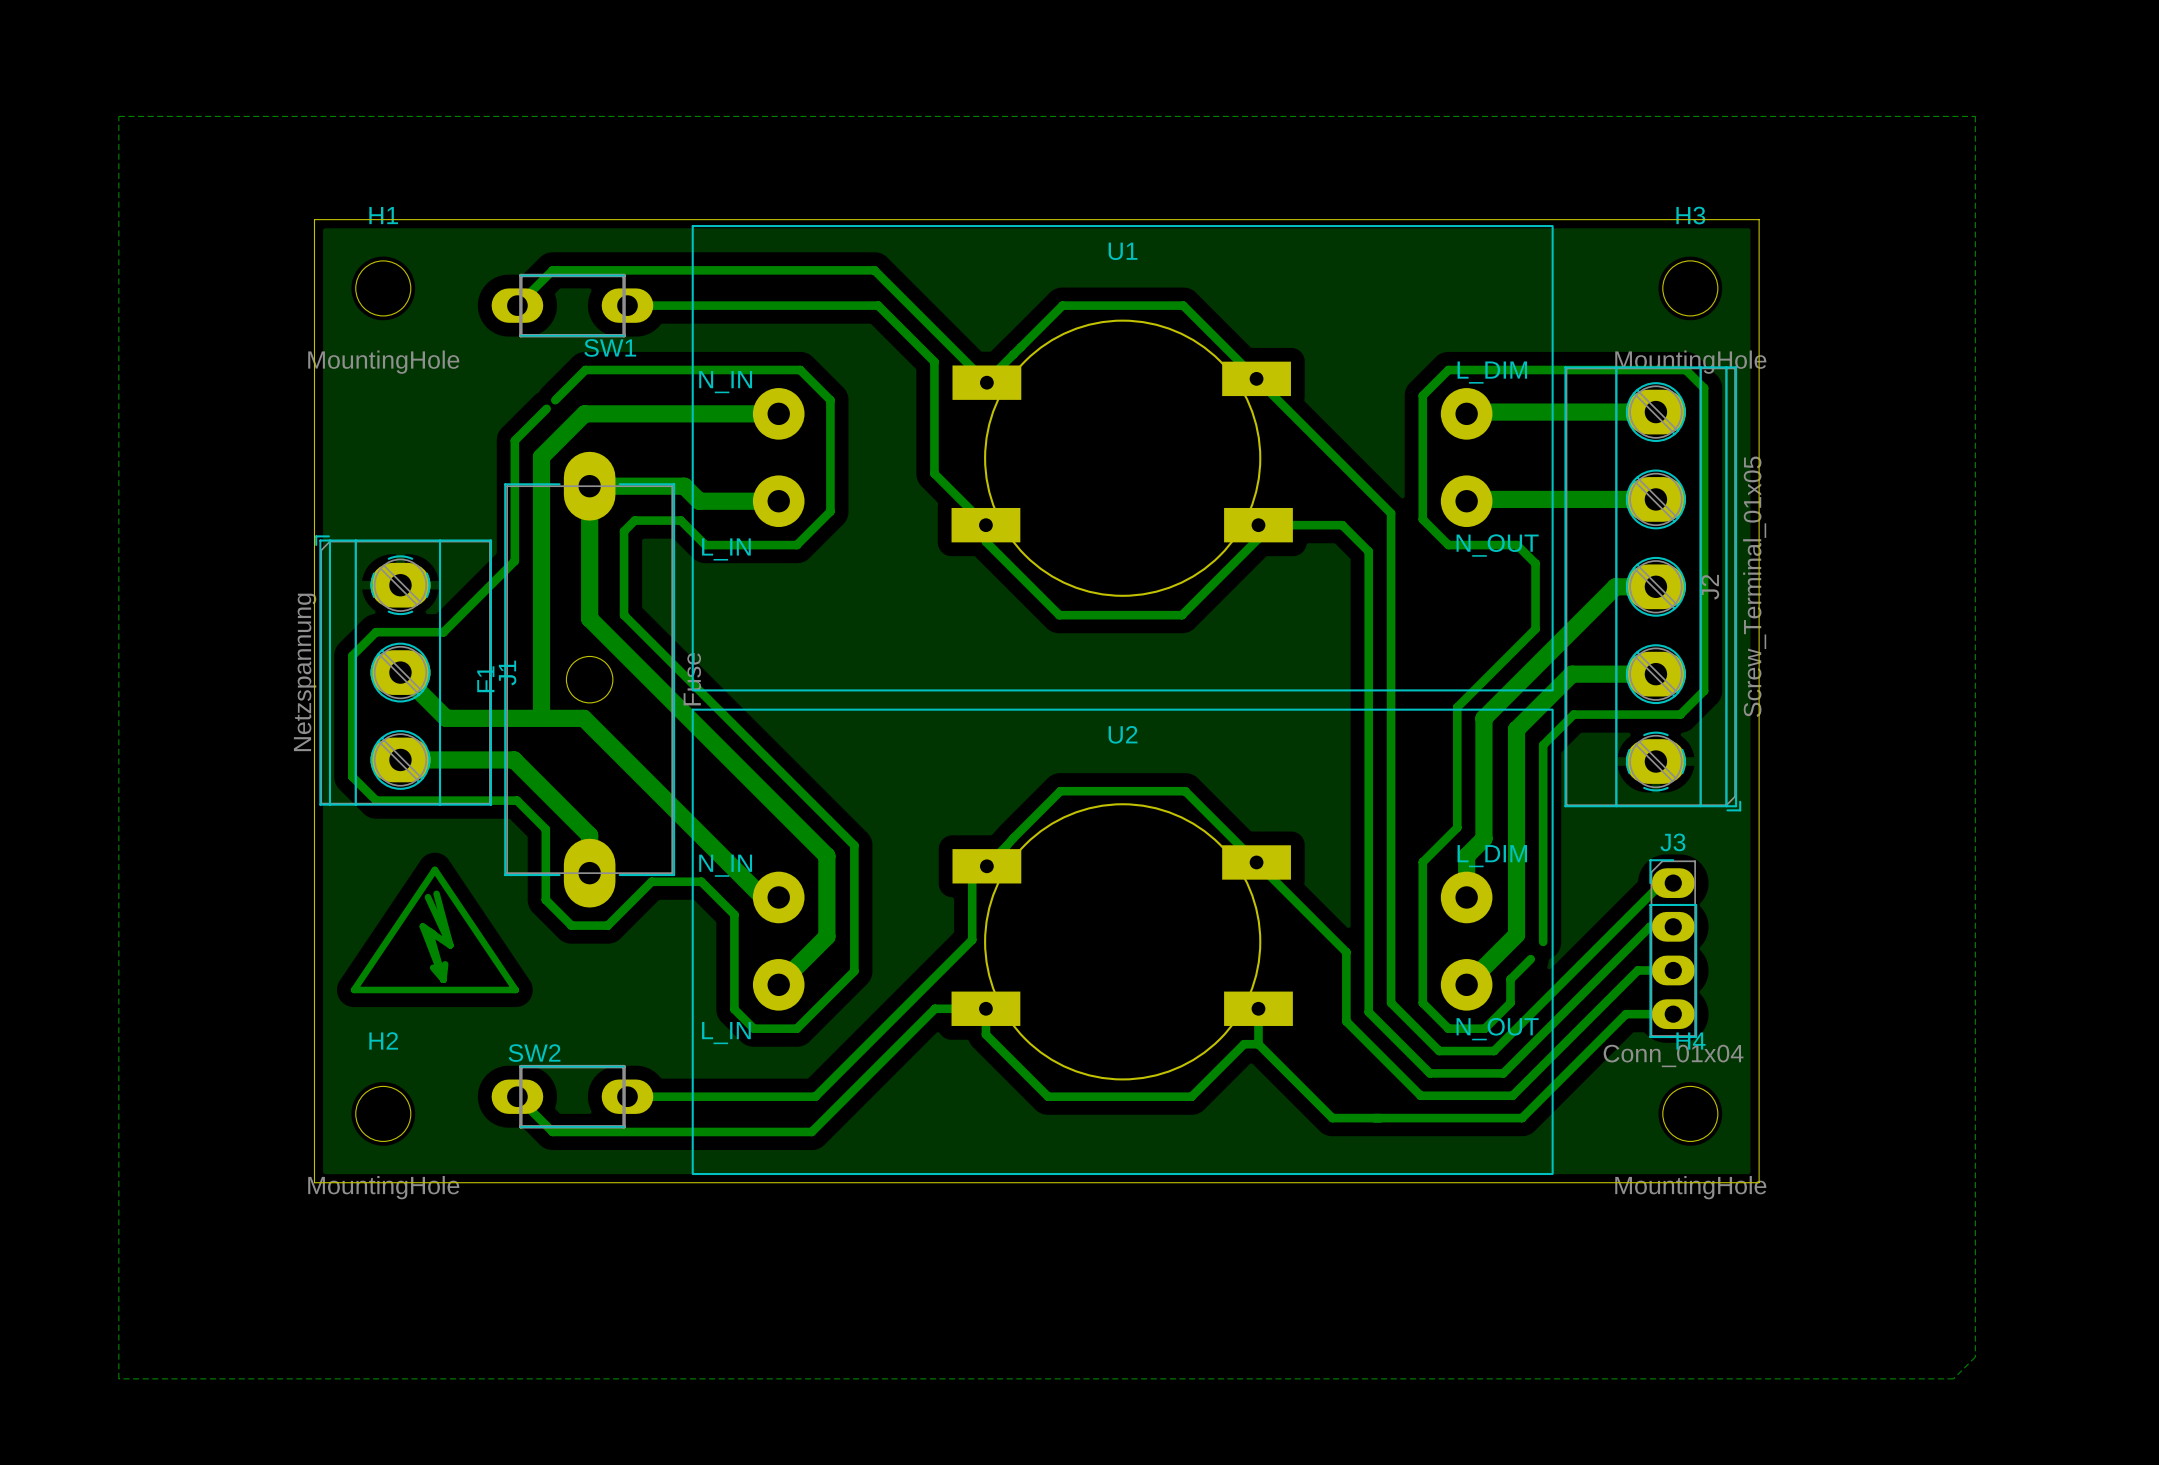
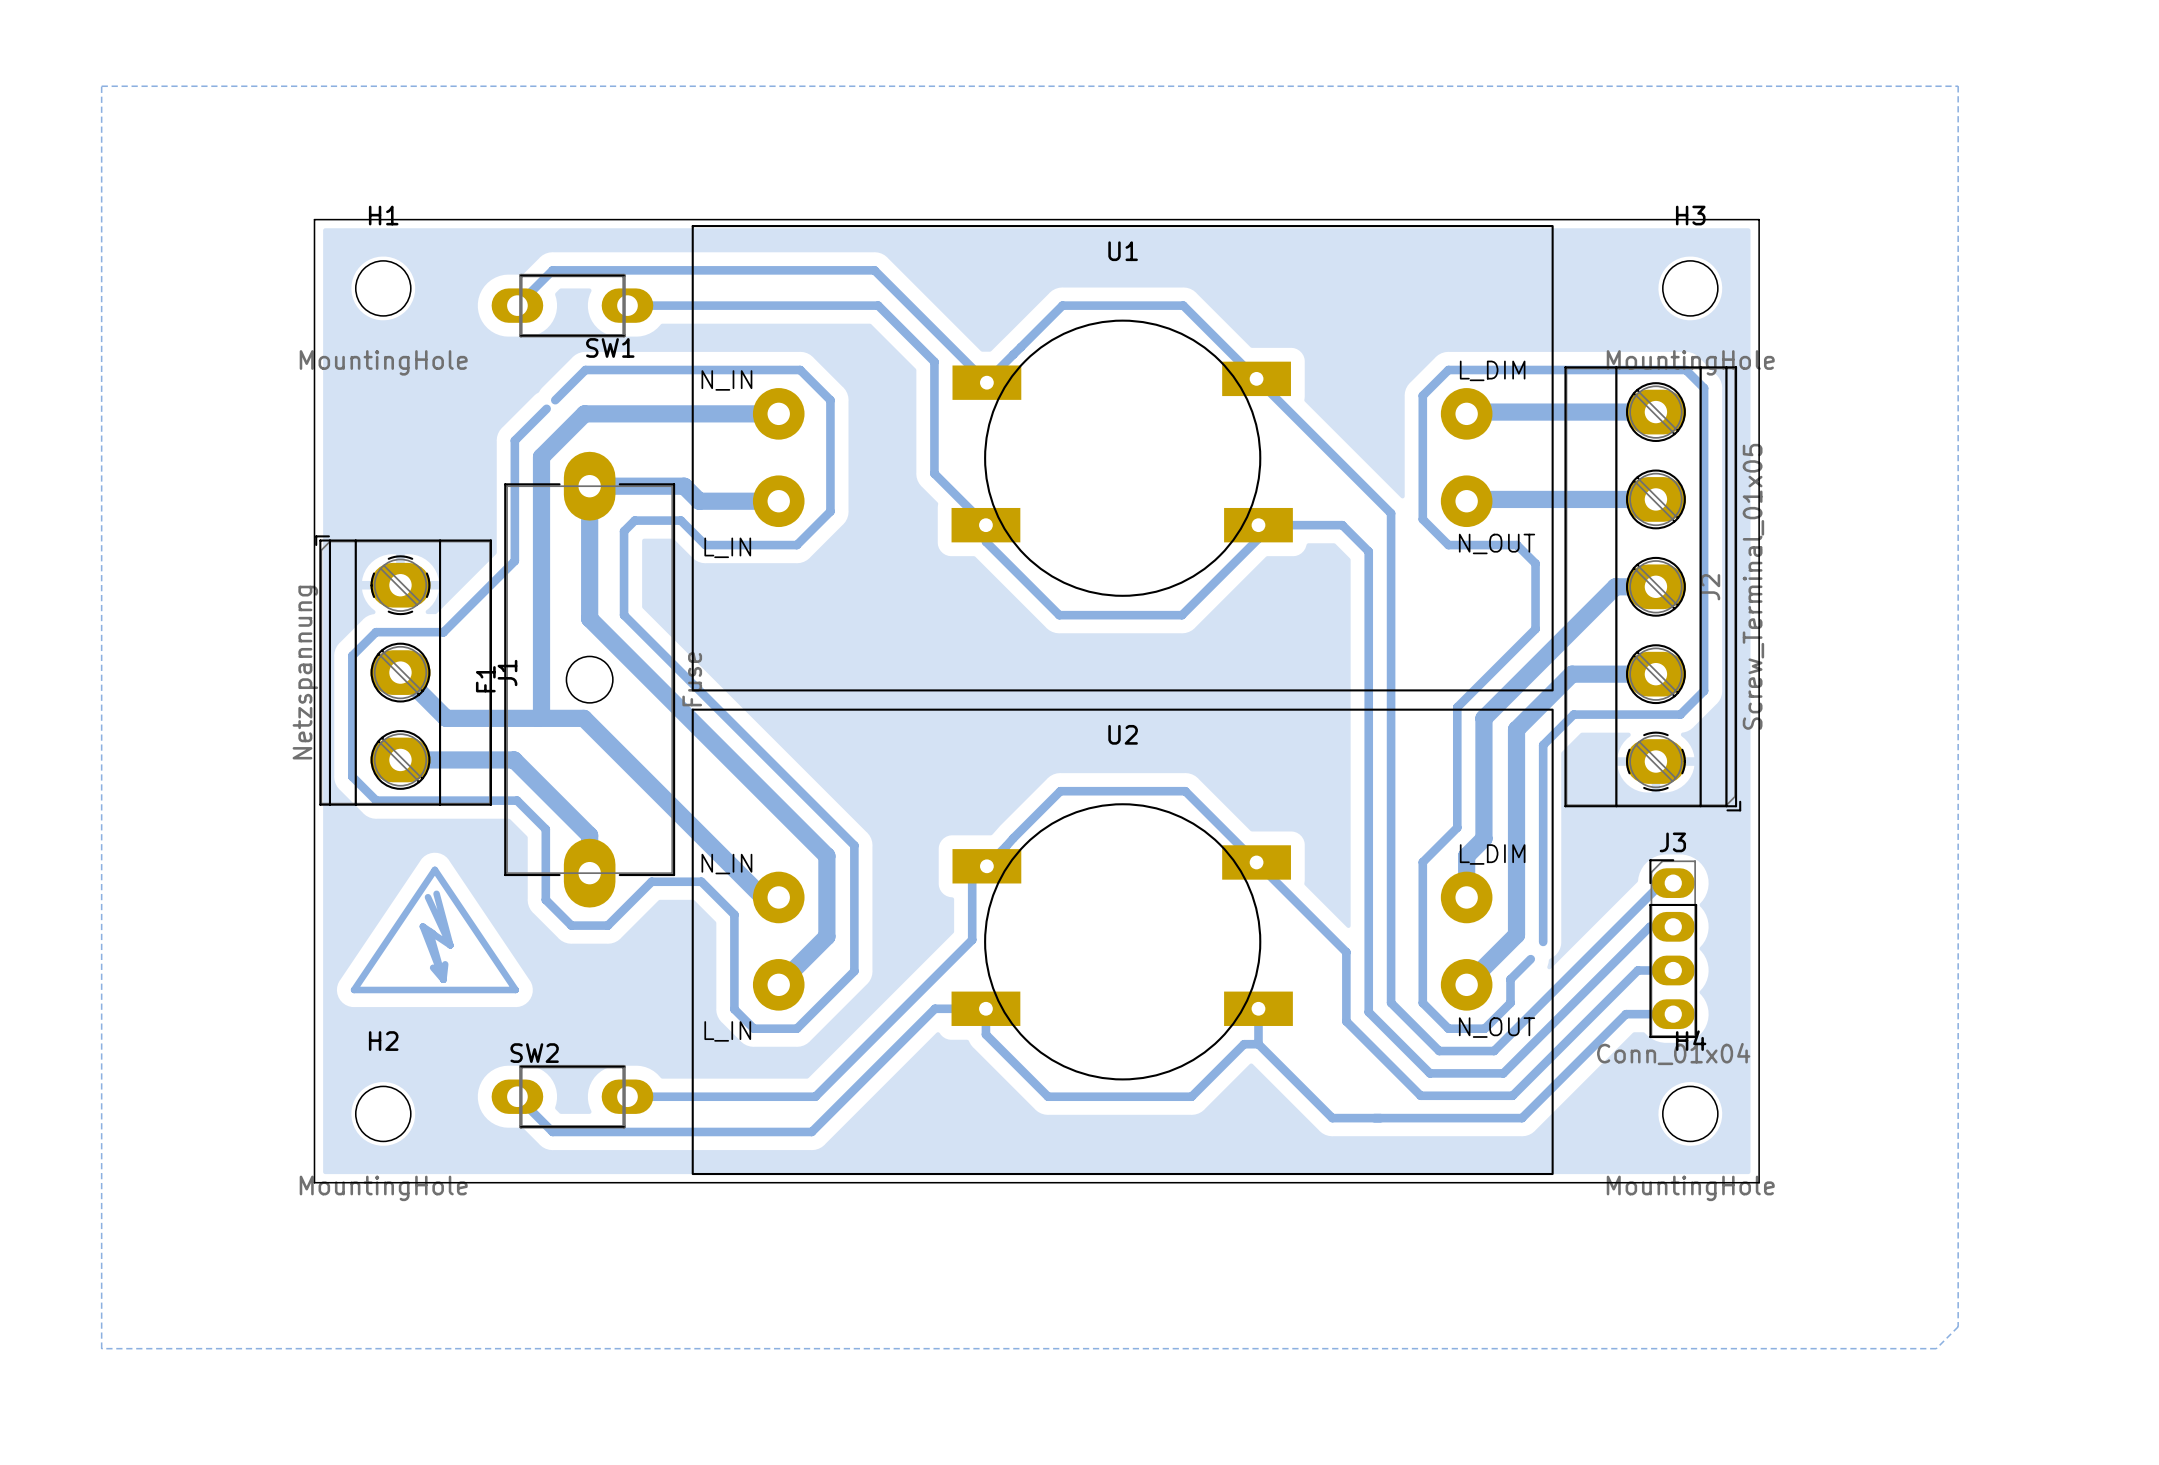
bottom zone outline: (118, 116) (1975, 116) (1975, 1357) (1953, 1378) (118, 1378) (118, 116) -> (101, 86) (101, 1348) (1936, 1348) (1958, 1326) (1958, 86) (101, 86)

